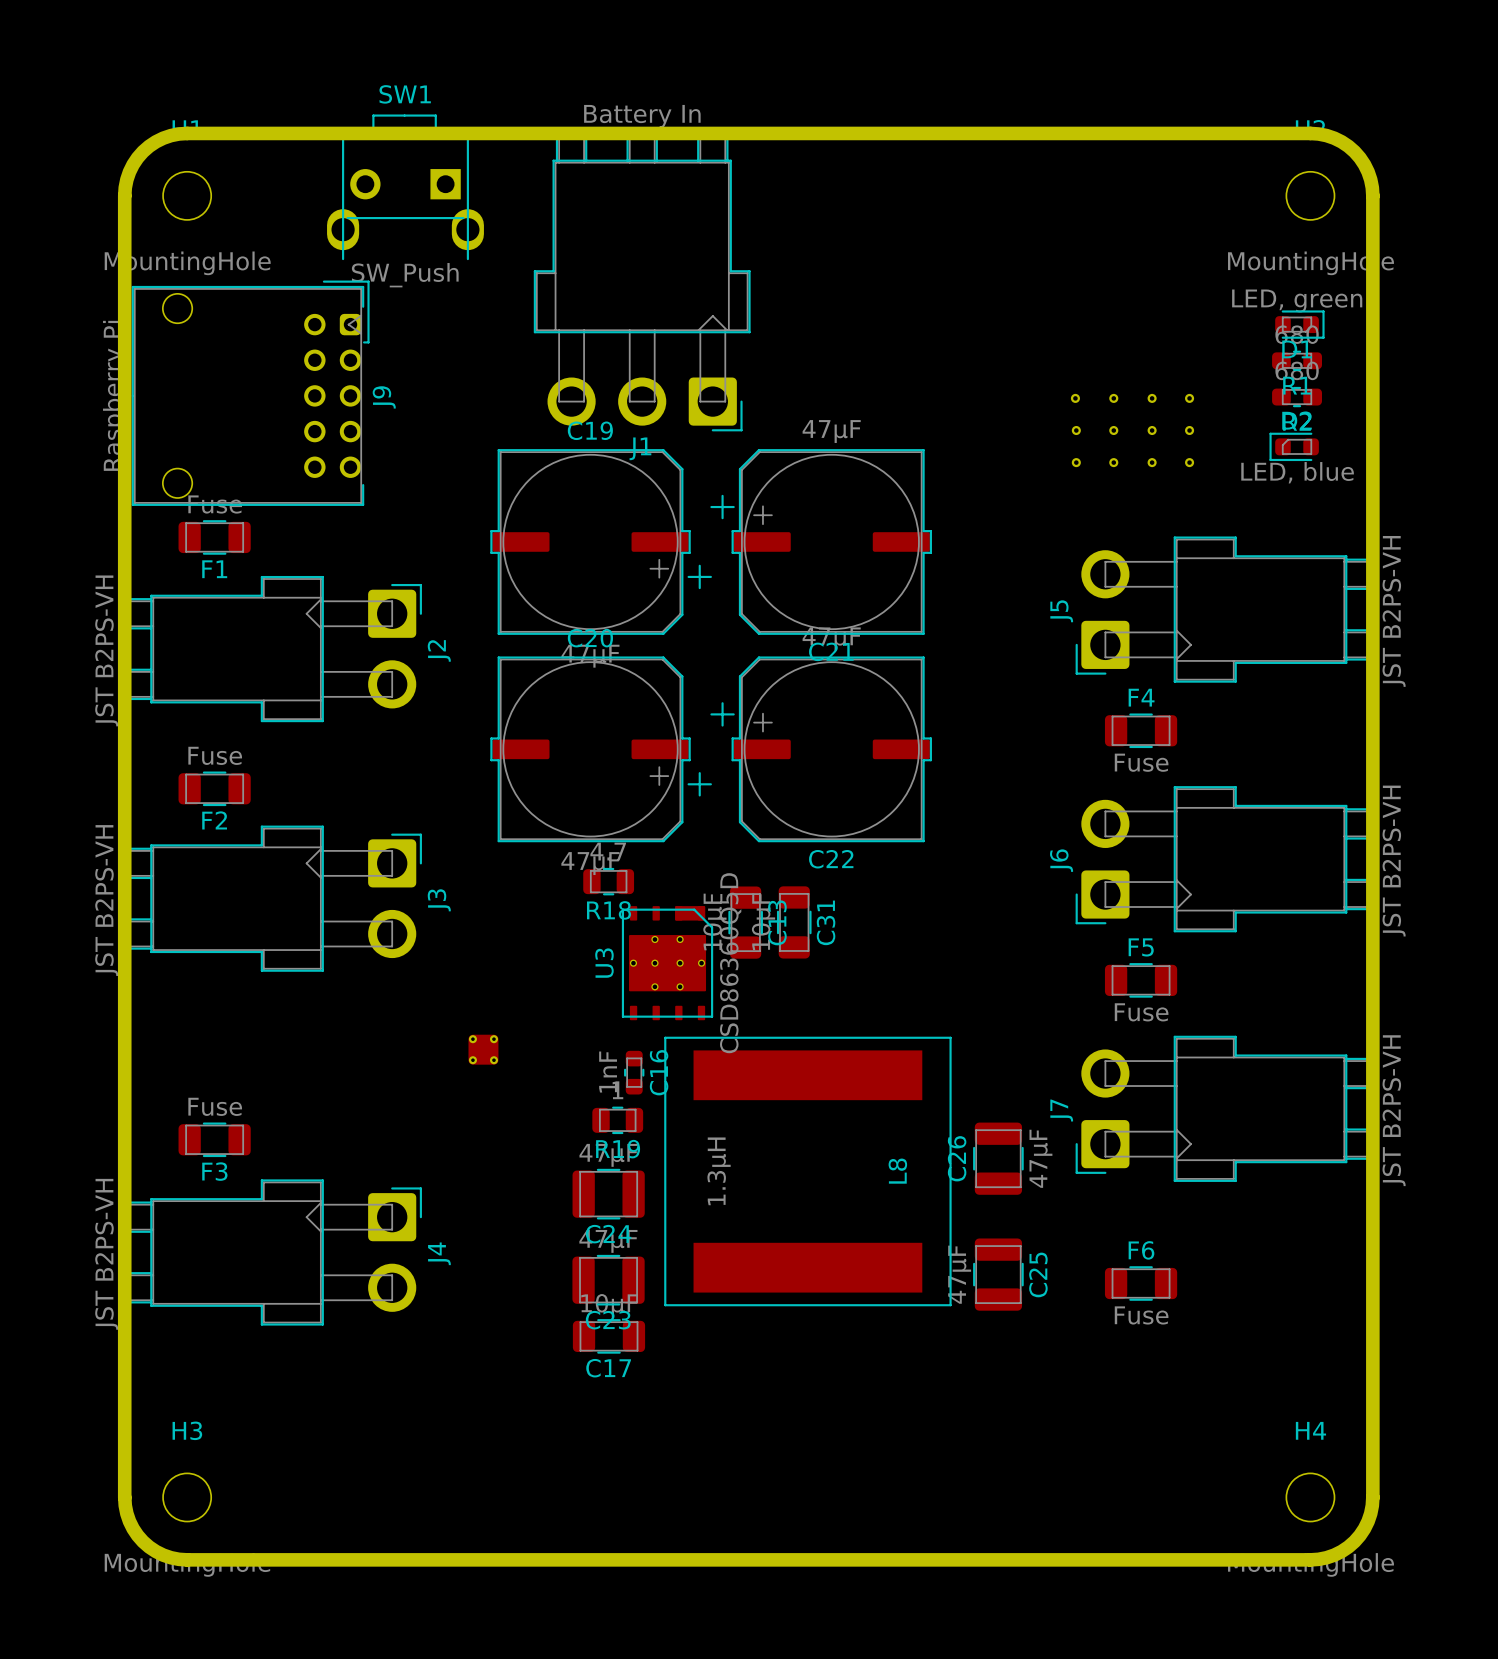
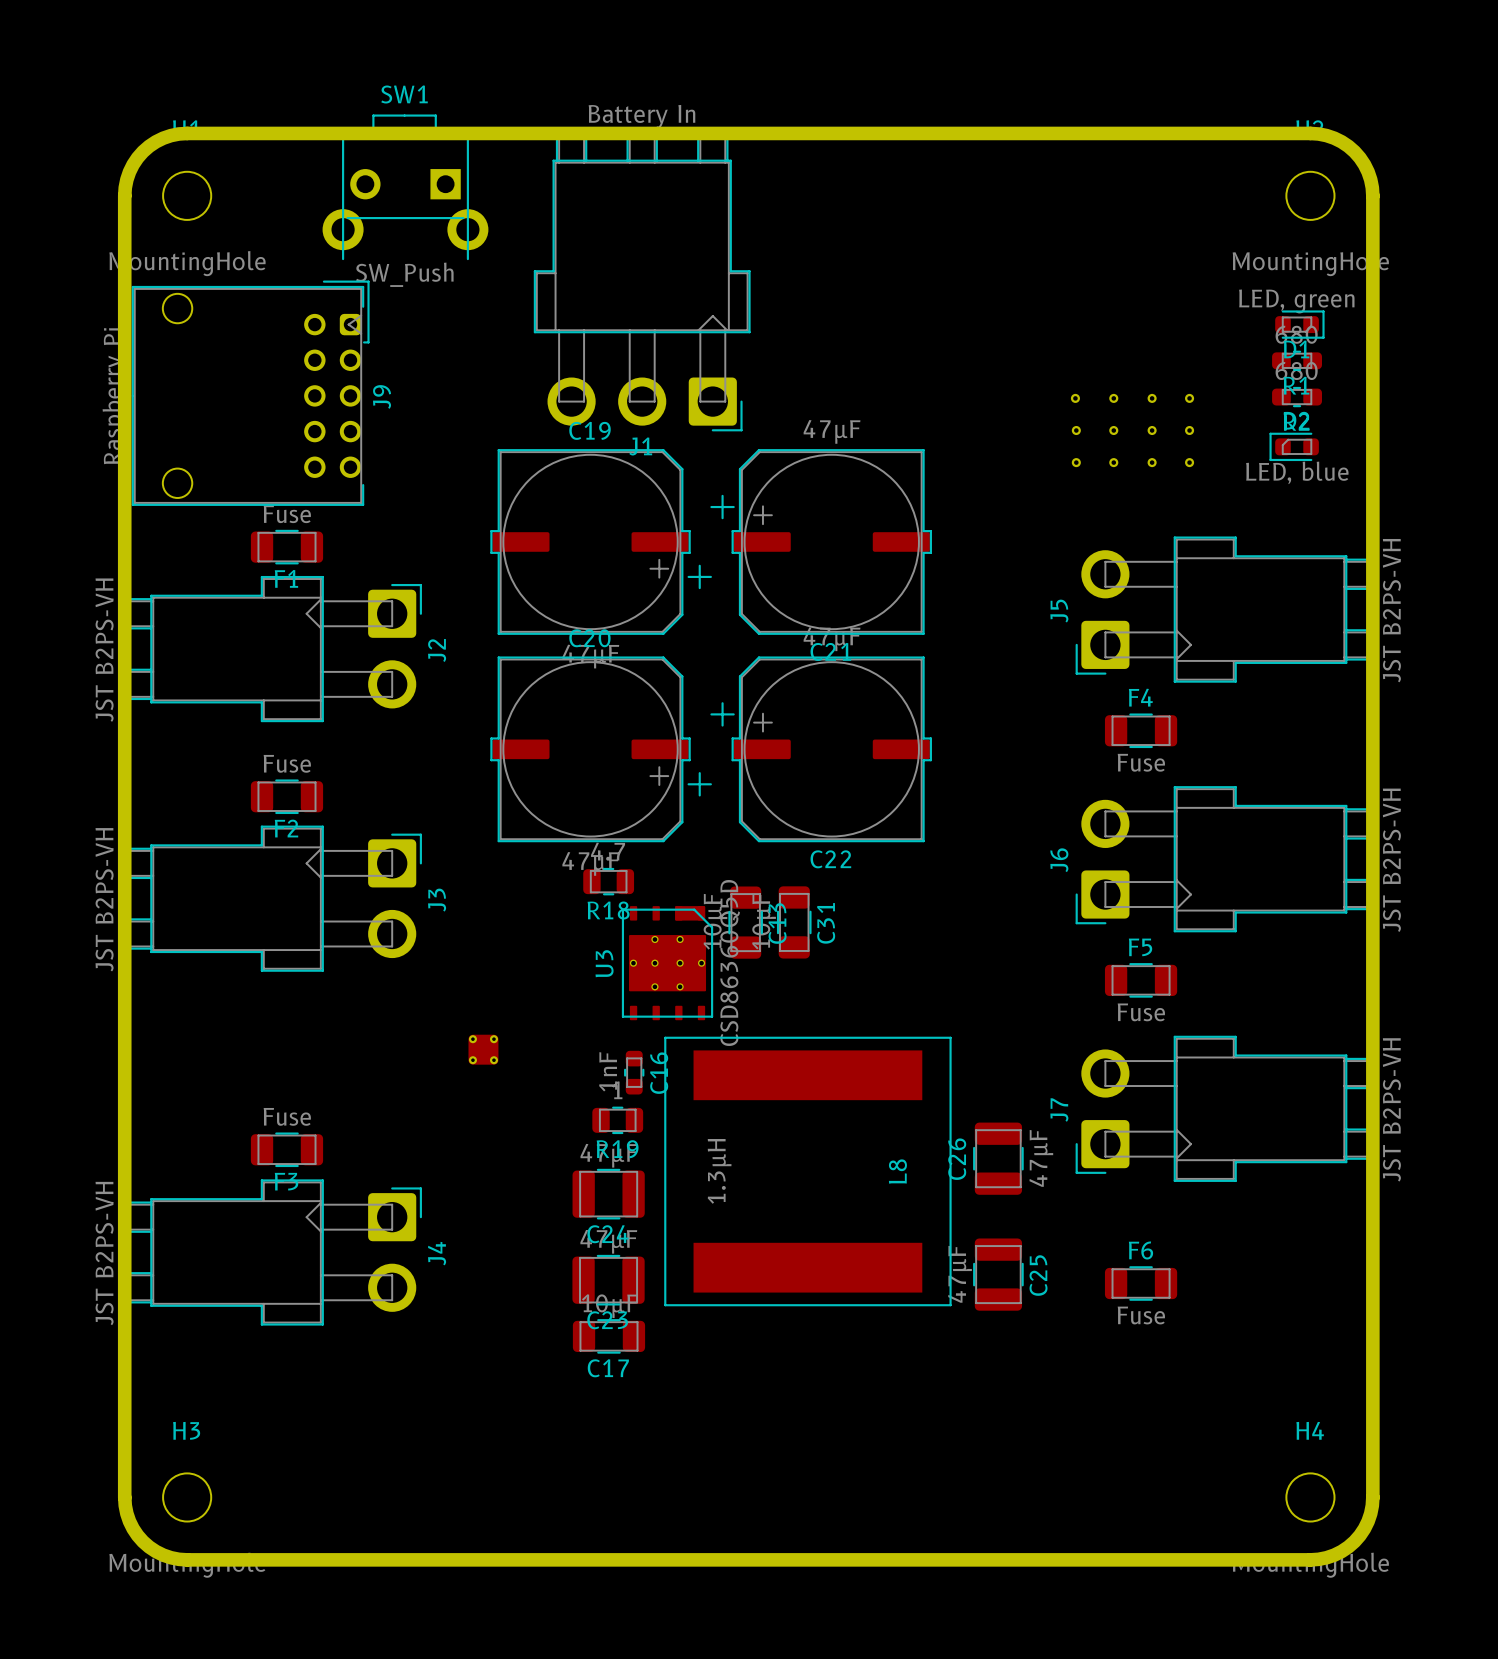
SW1 footprint: [327, 114, 484, 261] -> [322, 114, 489, 261]
F1 position: (214, 537) -> (286, 547)
F2 position: (214, 788) -> (286, 796)
F3 position: (214, 1139) -> (286, 1149)

